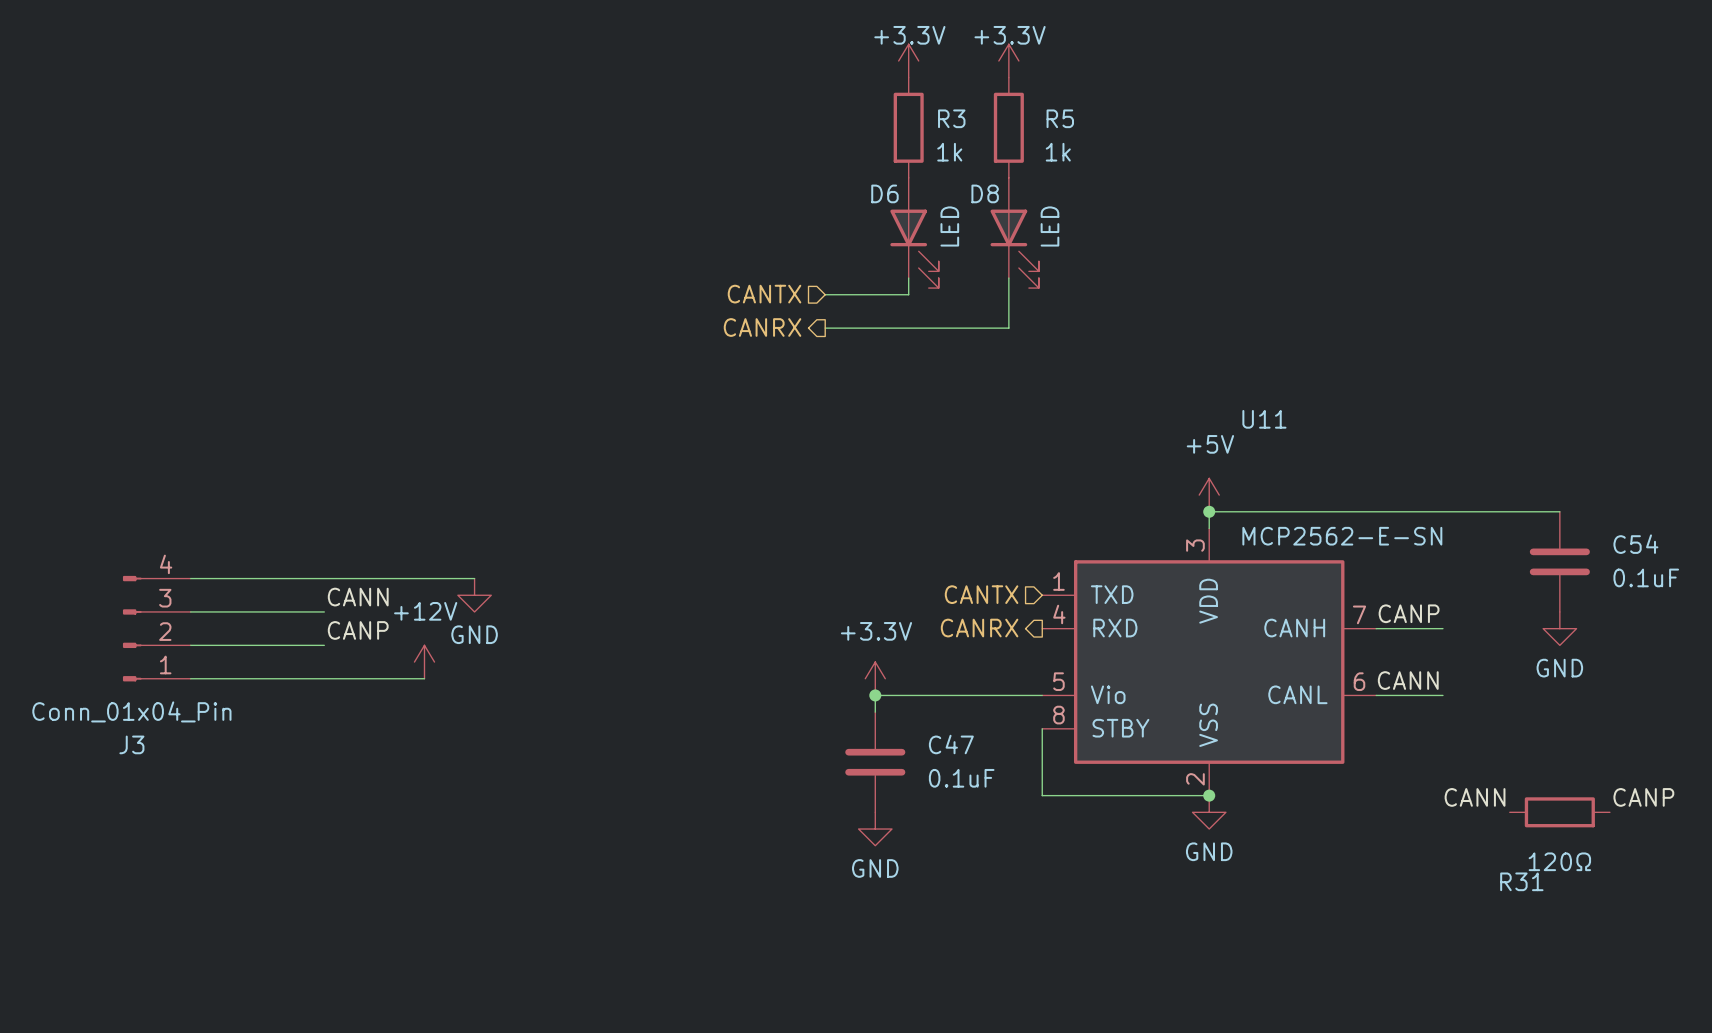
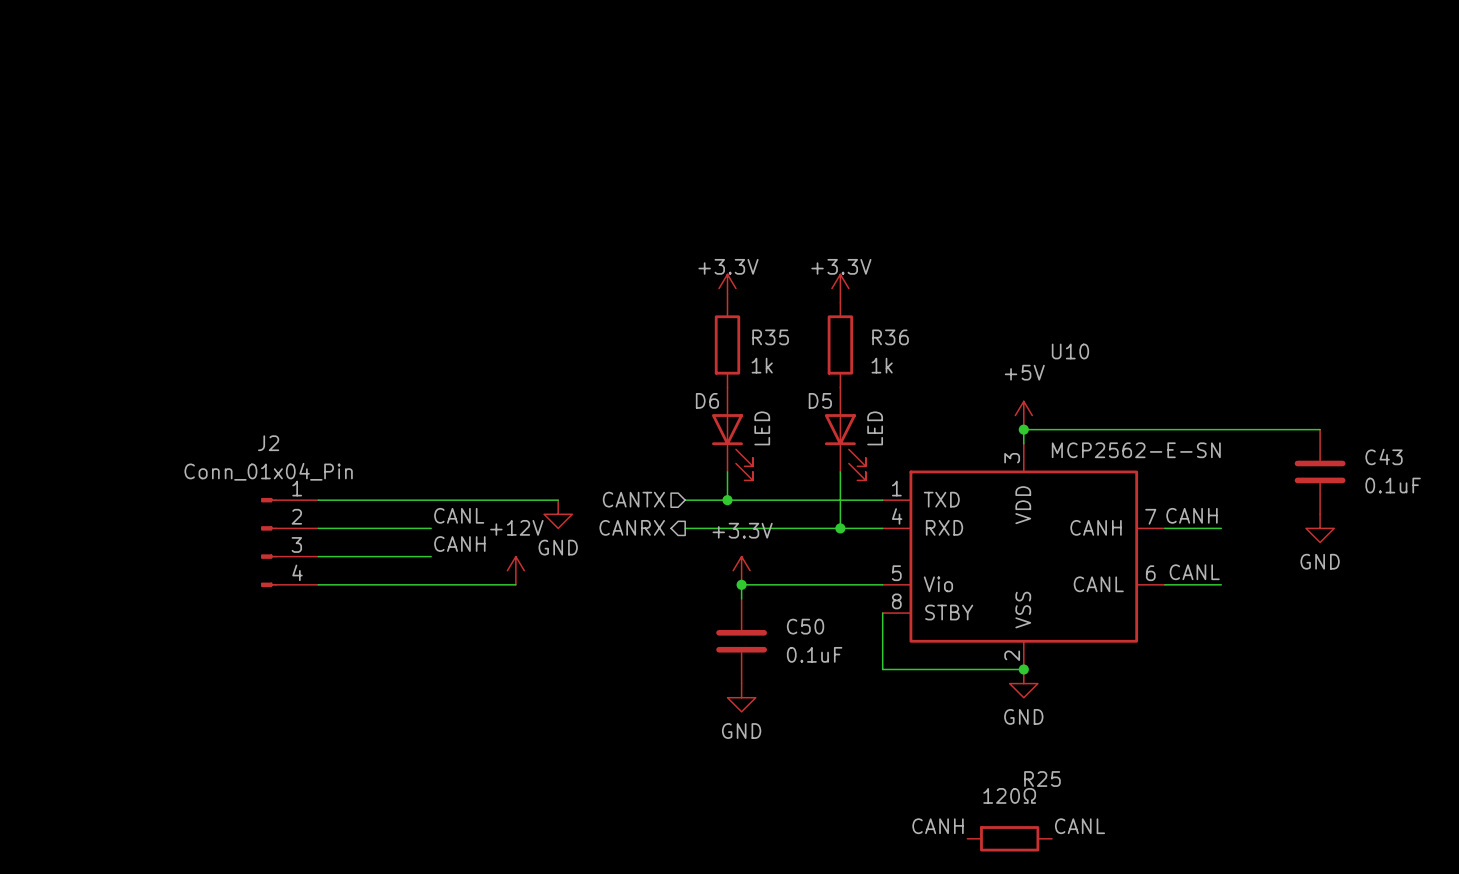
power symbol: +3.3V (908, 60) -> none
power symbol: +3.3V (1008, 60) -> none
R3: 1k (908, 127) -> none
R5: 1k (1008, 127) -> none
D6 position: (914, 232) -> (732, 433)
D8: LED (1014, 232) -> none
wire: (908, 278) (908, 294) (825, 294) -> none
wire: (1008, 278) (1008, 328) (825, 328) -> none
hierarchical label: CANTX (764, 294) -> none
hierarchical label: CANRX (762, 327) -> none
power symbol: none -> +3.3V (727, 288)
power symbol: none -> +3.3V (840, 288)
R35: none -> 1k (727, 344)
R36: none -> 1k (840, 344)
U11 name: U11 (1264, 419) -> U10 (1070, 351)
D5: none -> LED (845, 433)
C54 name: C54 (1635, 544) -> C43 (1384, 456)
wire: none -> (727, 471) (727, 500)
wire: none -> (840, 471) (840, 528)
wire: (190, 578) (474, 578) -> (318, 500) (558, 500)
hierarchical label: none -> CANTX (633, 499)
hierarchical label: CANTX (981, 594) -> none
power symbol position: GND (474, 595) -> GND (558, 514)
wire: none -> (685, 500) (882, 500)
junction: none -> (727, 500)
label: CANN (358, 597) -> none
wire: (190, 611) (324, 611) -> (318, 528) (431, 528)
label: none -> CANL (459, 515)
label: CANP (1409, 613) -> CANH (1191, 515)
J3: Conn_01x04_Pin (156, 628) -> none
hierarchical label: none -> CANRX (632, 527)
wire: none -> (685, 528) (882, 528)
hierarchical label: CANRX (979, 628) -> none
junction: none -> (840, 528)
label: CANP (358, 630) -> none
wire: (190, 645) (324, 645) -> (318, 556) (431, 556)
J2: none -> Conn_01x04_Pin (289, 542)
label: none -> CANH (459, 544)
power symbol position: +12V (424, 662) -> +12V (515, 570)
wire: (190, 678) (424, 678) -> (318, 584) (515, 584)
label: CANN (1408, 680) -> CANL (1194, 572)
C47 name: C47 (951, 744) -> C50 (805, 626)
label: CANN (1475, 797) -> none
label: CANP (1643, 797) -> none
R31: 120Ω (1559, 812) -> none
label: none -> CANH (938, 826)
label: none -> CANL (1080, 826)
R25: none -> 120Ω (1009, 838)

